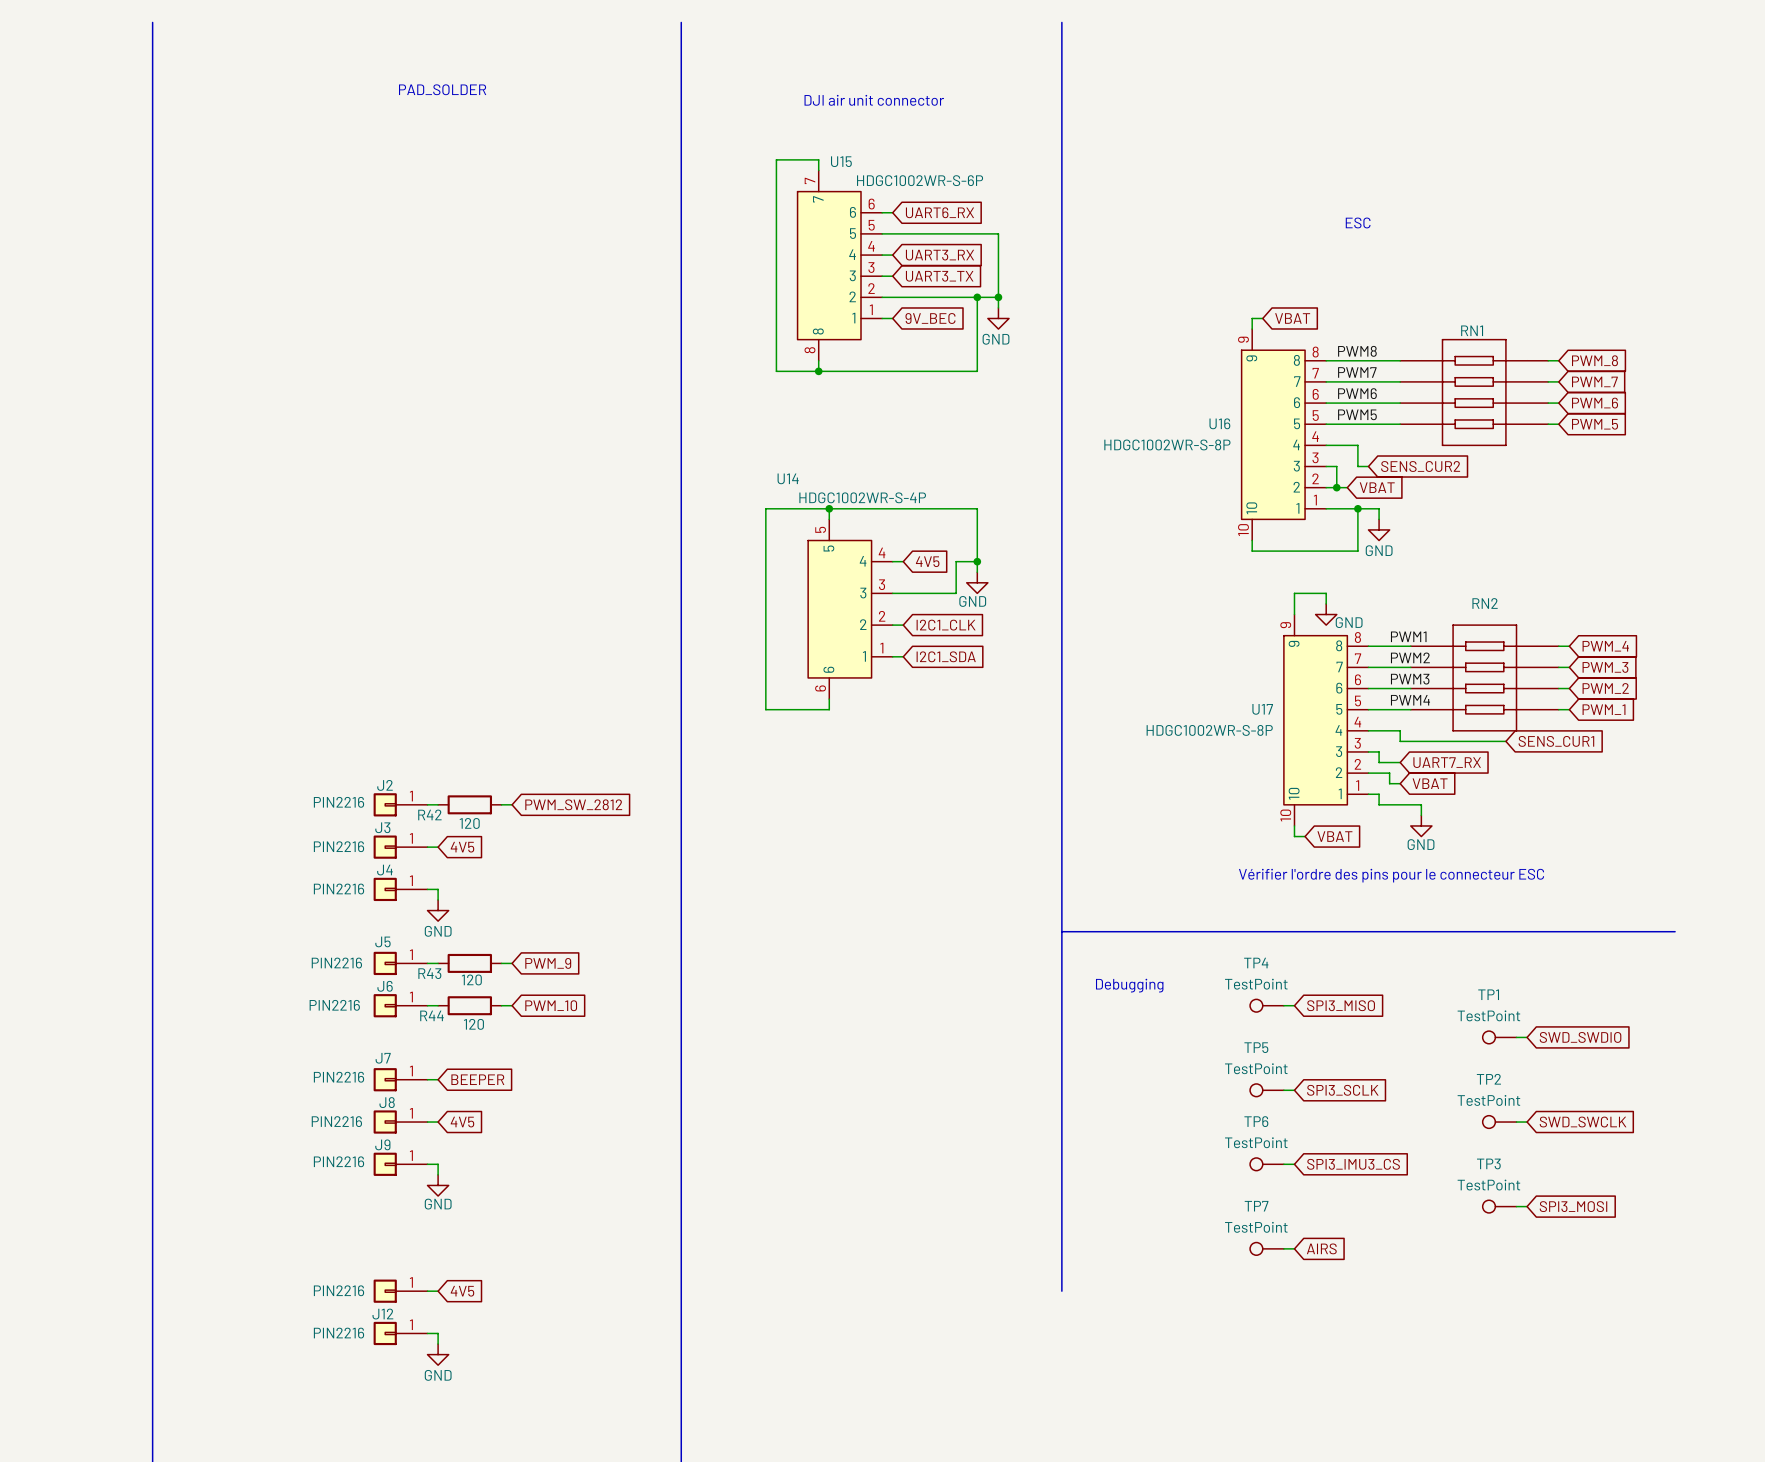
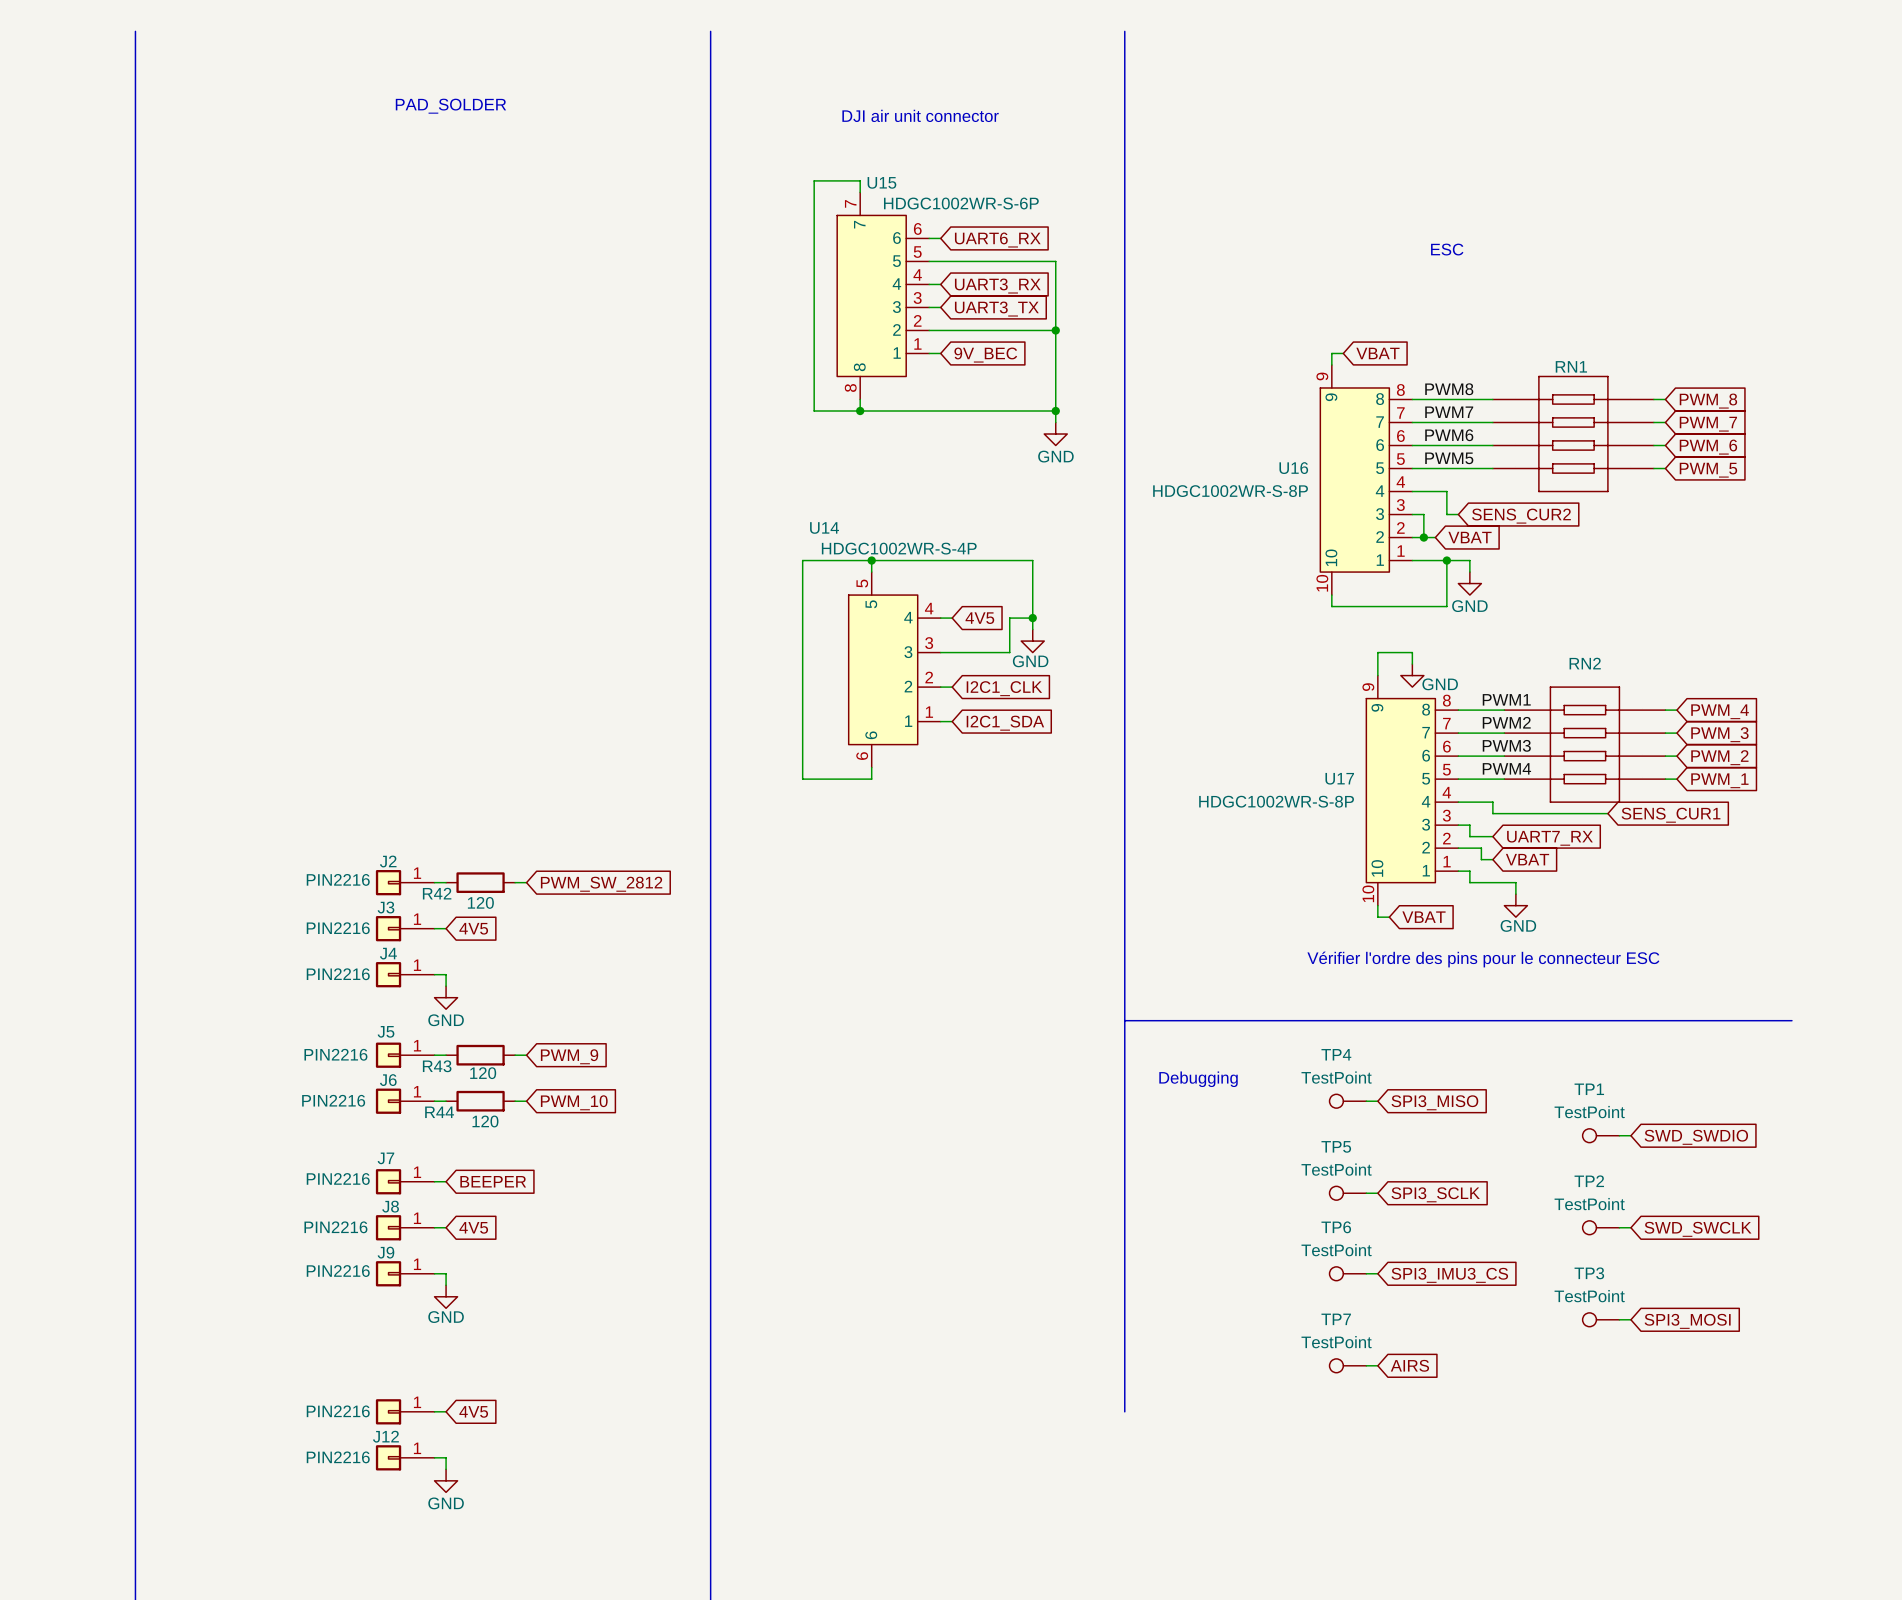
wire: (977, 297) (977, 371) -> (1055, 411) (1032, 411)
junction: (977, 297) -> none
wire: none -> (1055, 341) (1055, 422)
power symbol position: GND (998, 318) -> GND (1055, 434)
junction: none -> (1055, 411)

